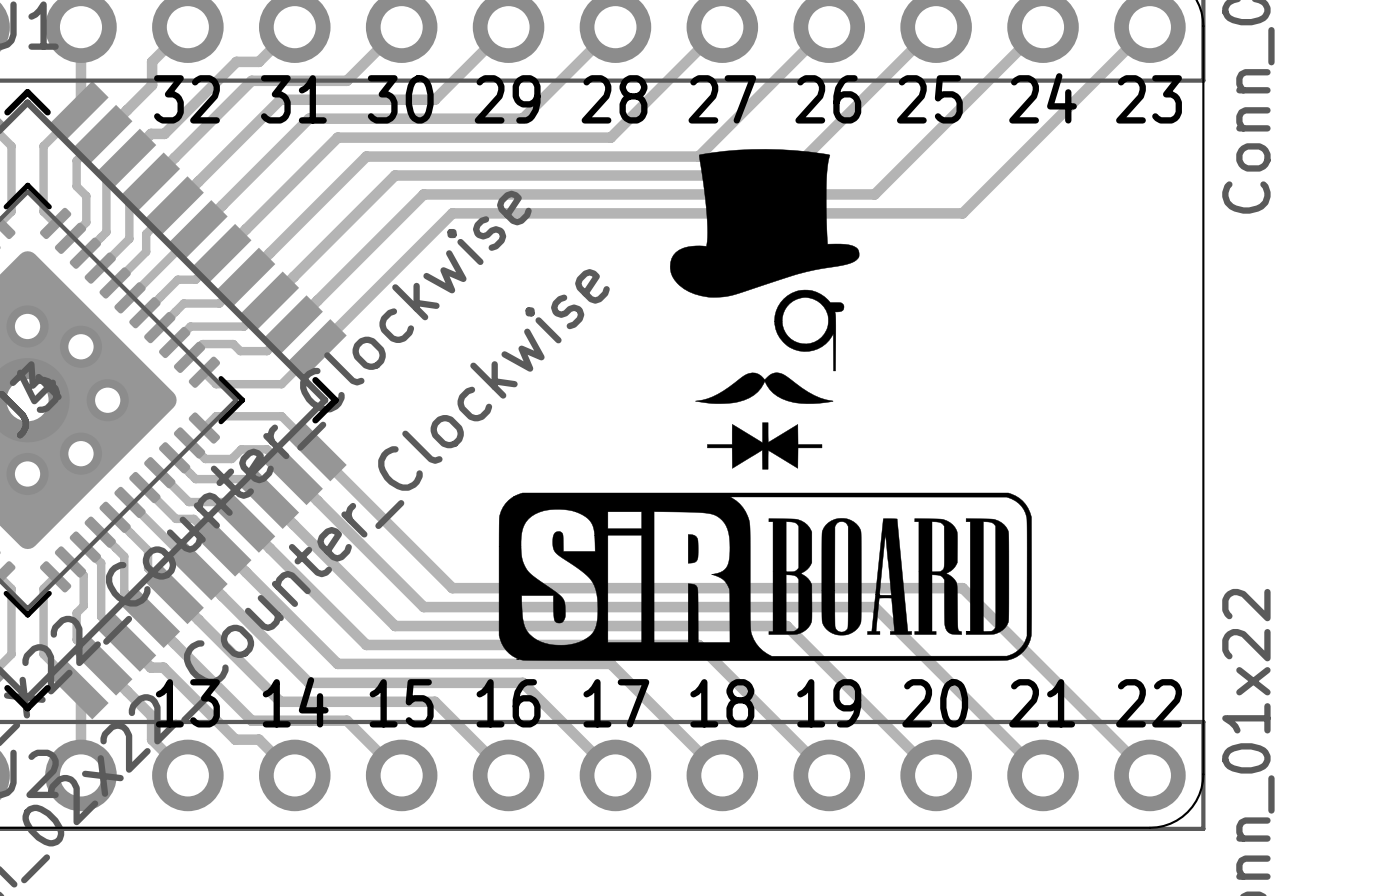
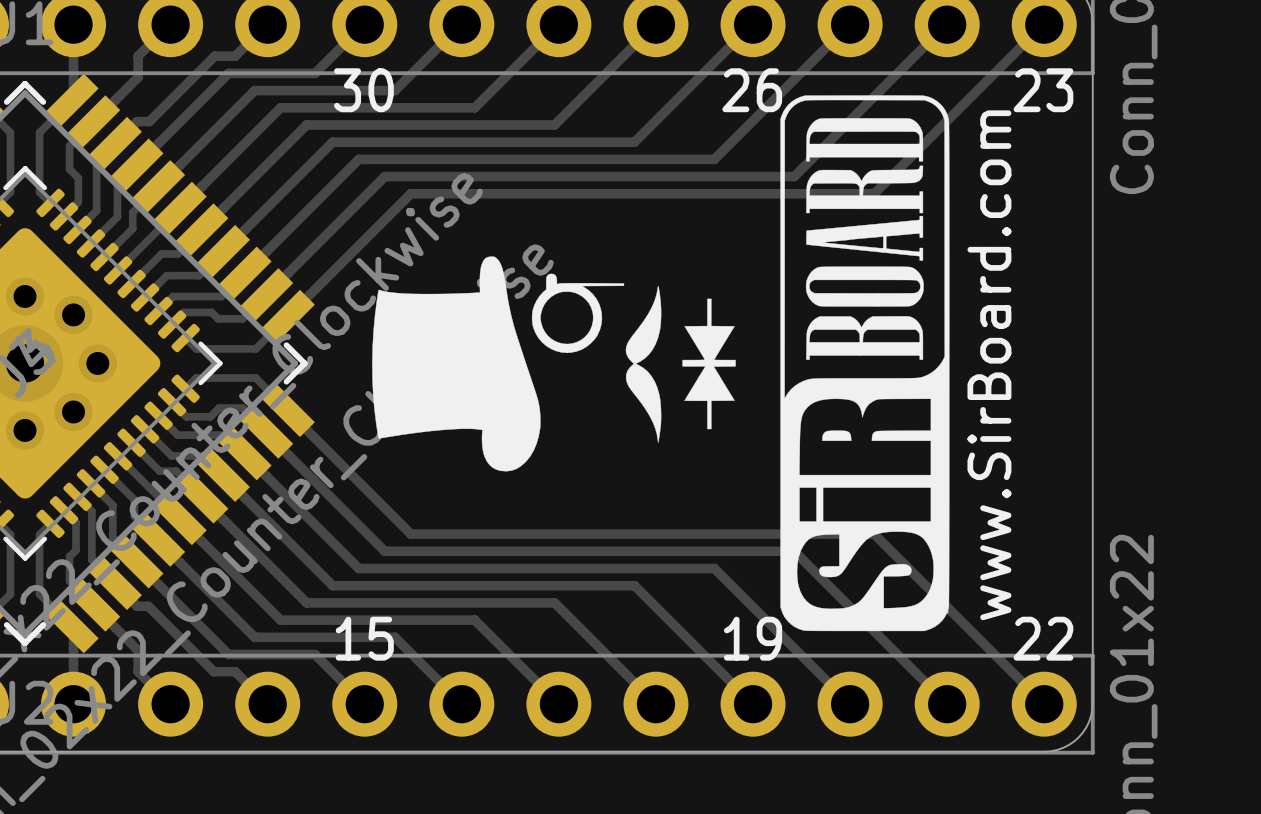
text: 24 (1043, 98) -> none
text: 32 (186, 99) -> none
text: 31 (293, 99) -> none
text: 29 (507, 99) -> none
text: 28 (614, 99) -> none
text: 27 (722, 99) -> none
text: 25 (929, 99) -> none
drawing: none -> [372, 95, 950, 632]
drawing: [498, 149, 1032, 661] -> none
text: none -> www.SirBoard.com (989, 365)
text: 14 (295, 702) -> none
text: 13 (187, 703) -> none
text: 16 (508, 703) -> none
text: 17 (616, 703) -> none
text: 18 (722, 703) -> none
text: 20 (935, 703) -> none
text: 21 (1042, 703) -> none

